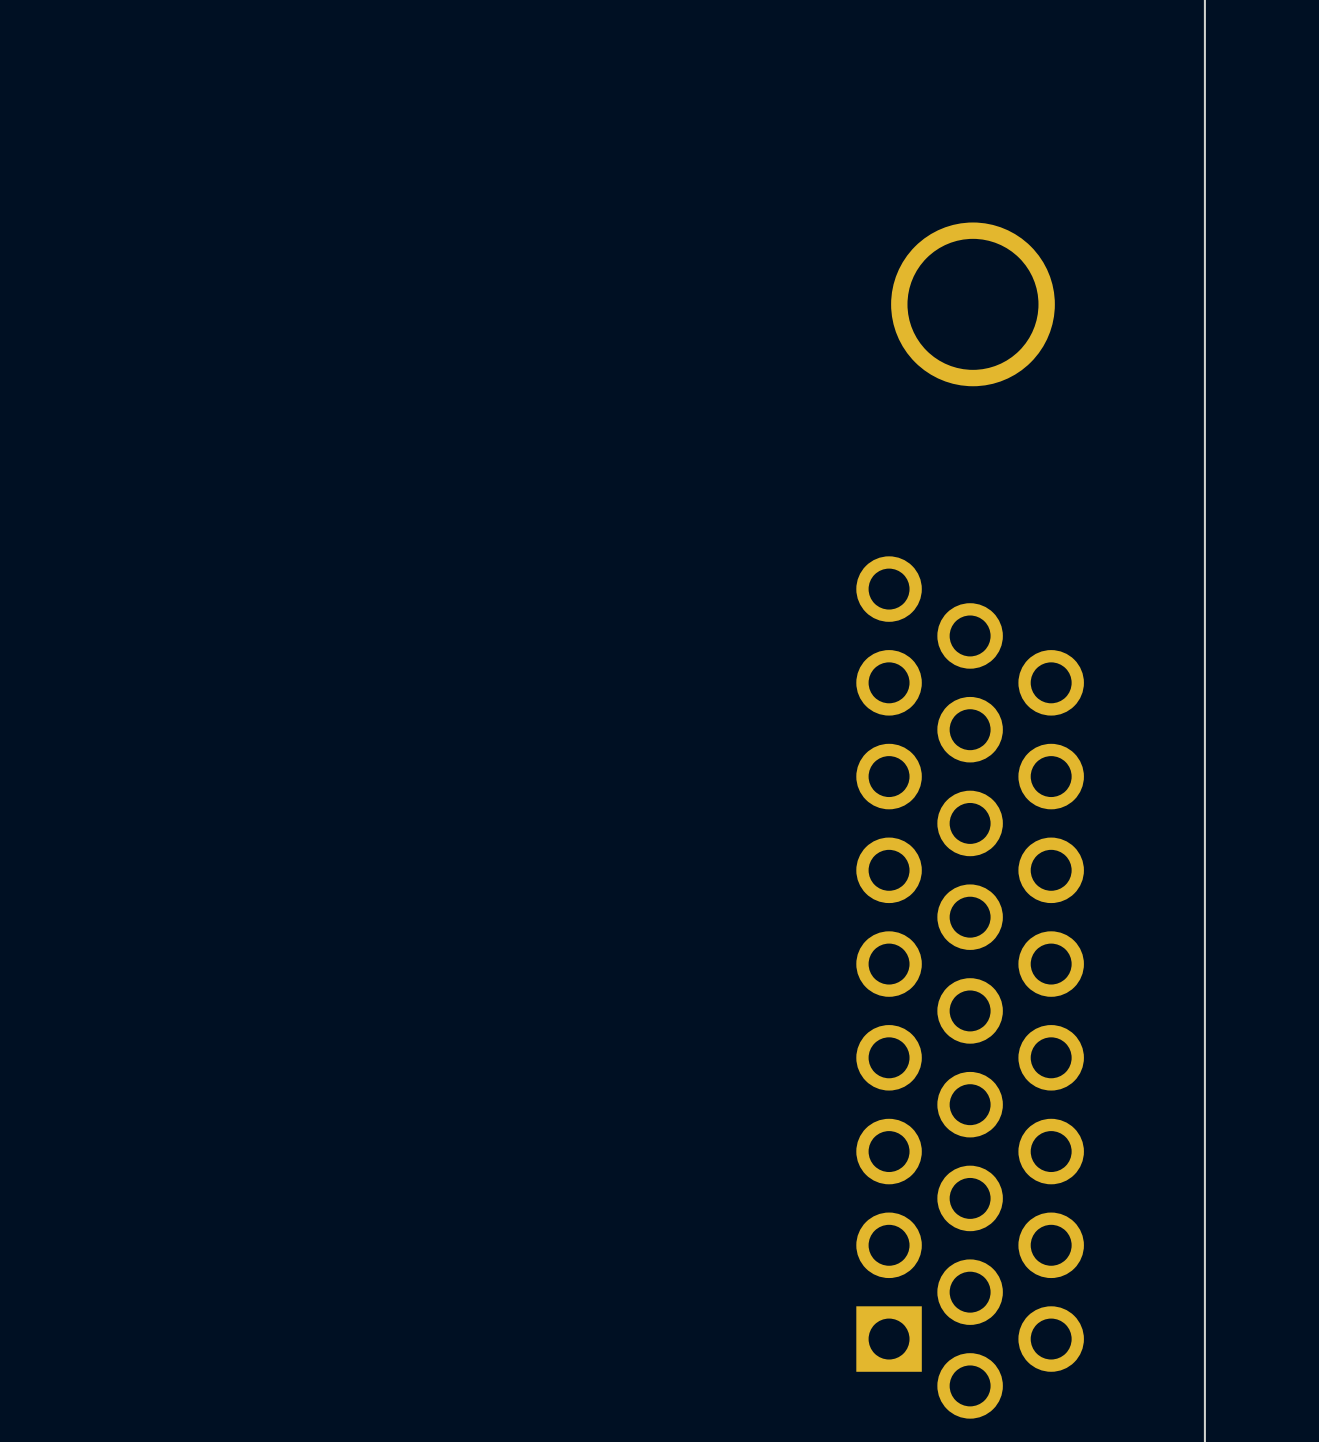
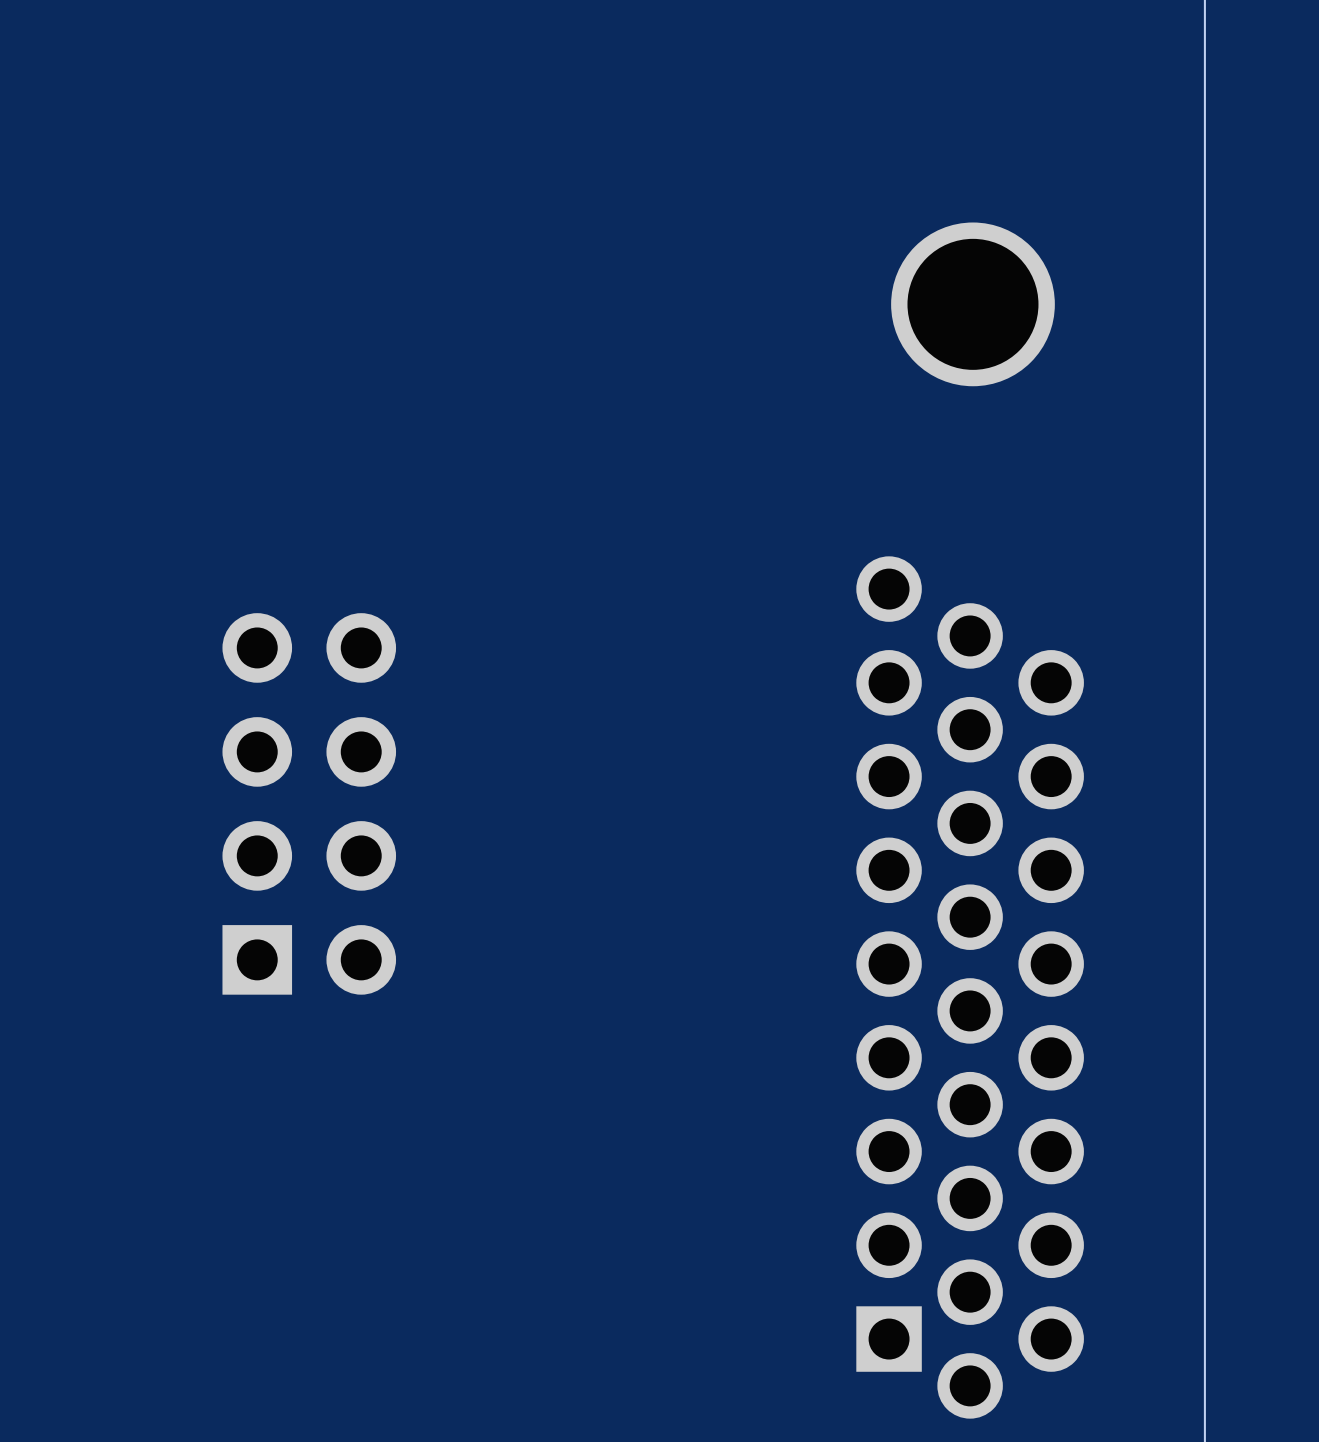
part: none -> (309, 803)

